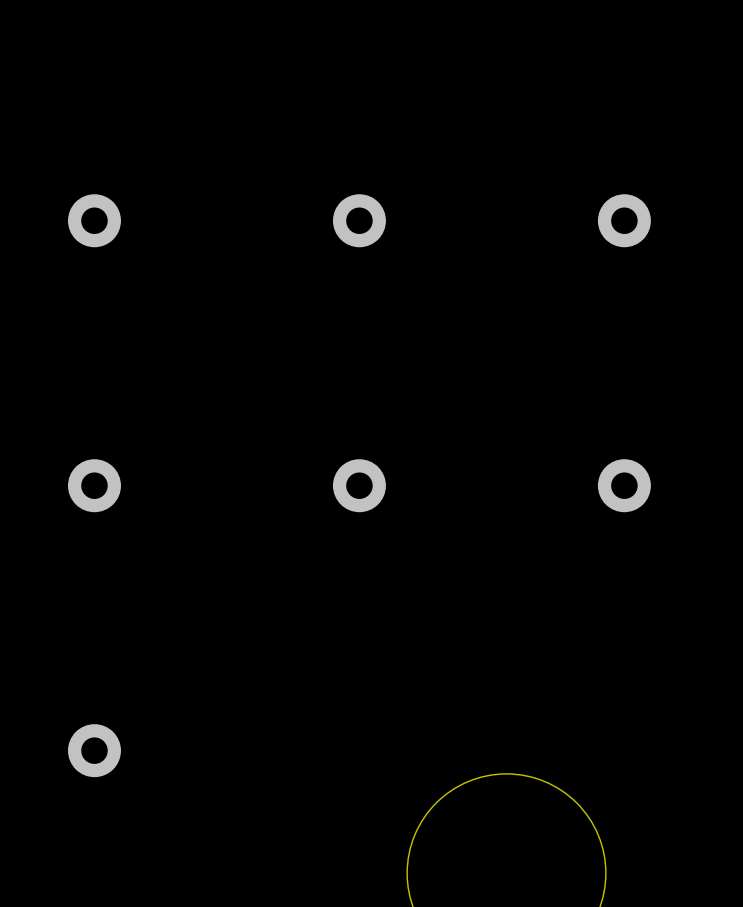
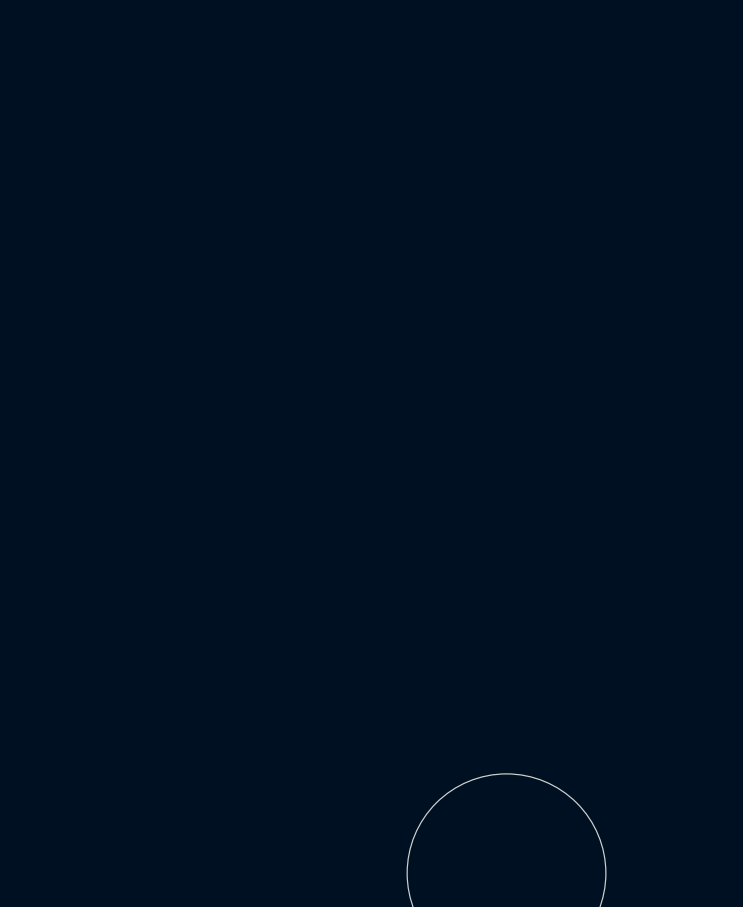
via: (94, 220) -> none
via: (359, 220) -> none
via: (624, 220) -> none
via: (94, 485) -> none
via: (359, 485) -> none
via: (624, 485) -> none
via: (94, 750) -> none

